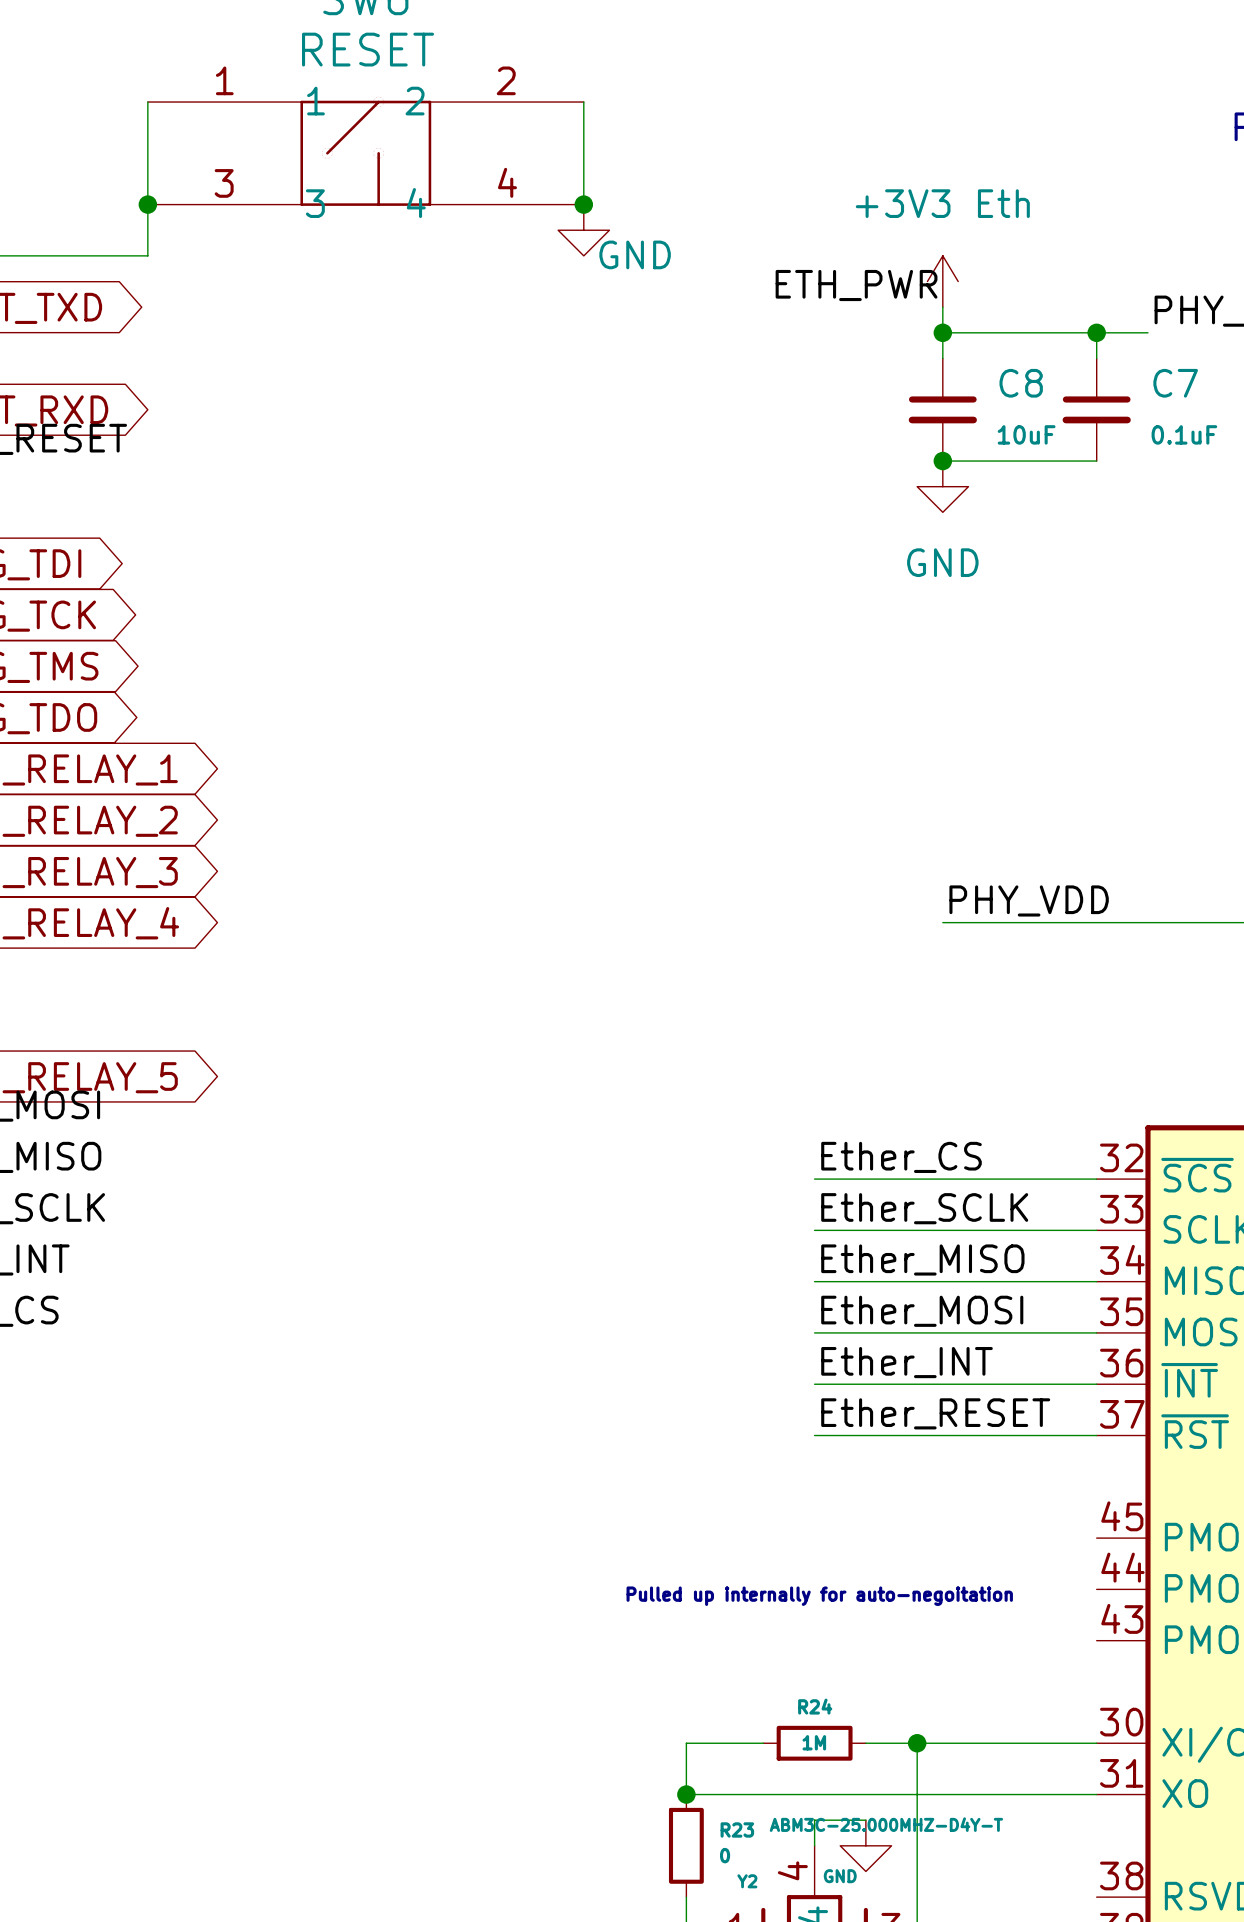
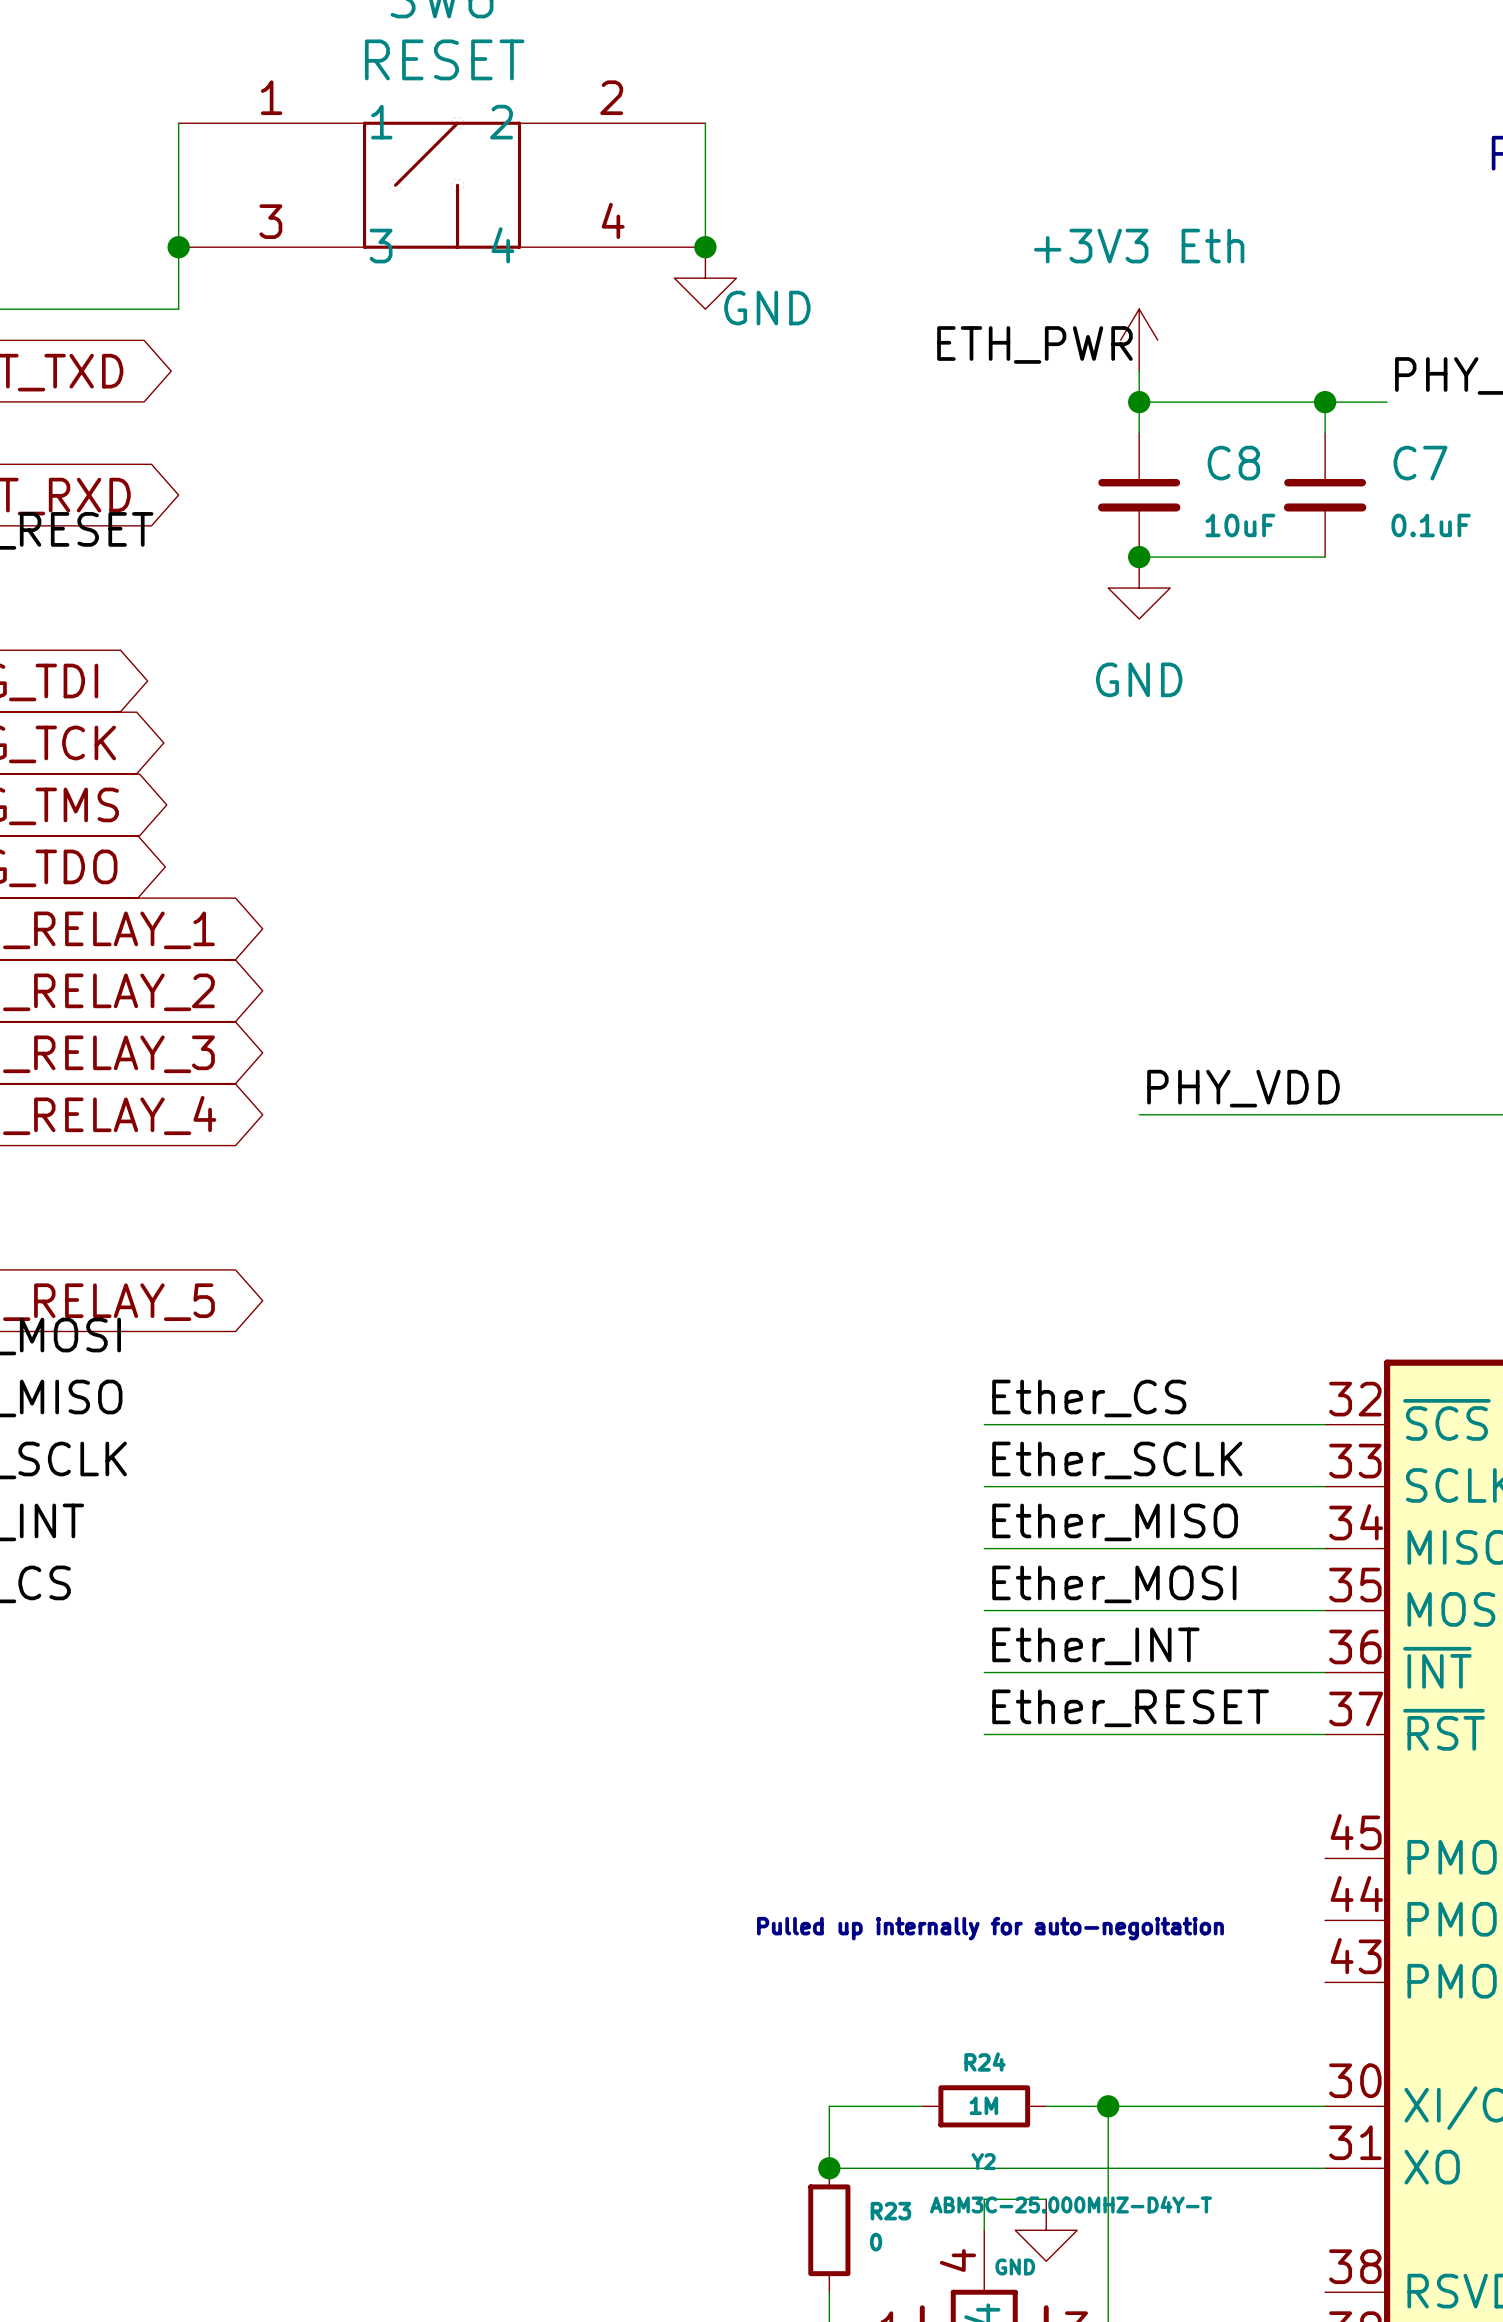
Y2 name position: Y2 (747, 1881) -> Y2 (983, 2161)

